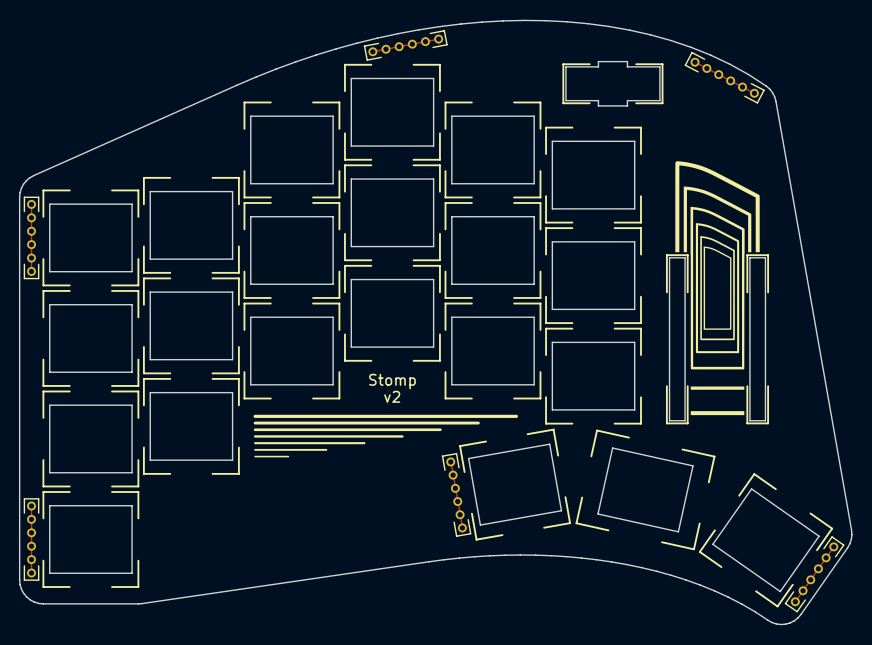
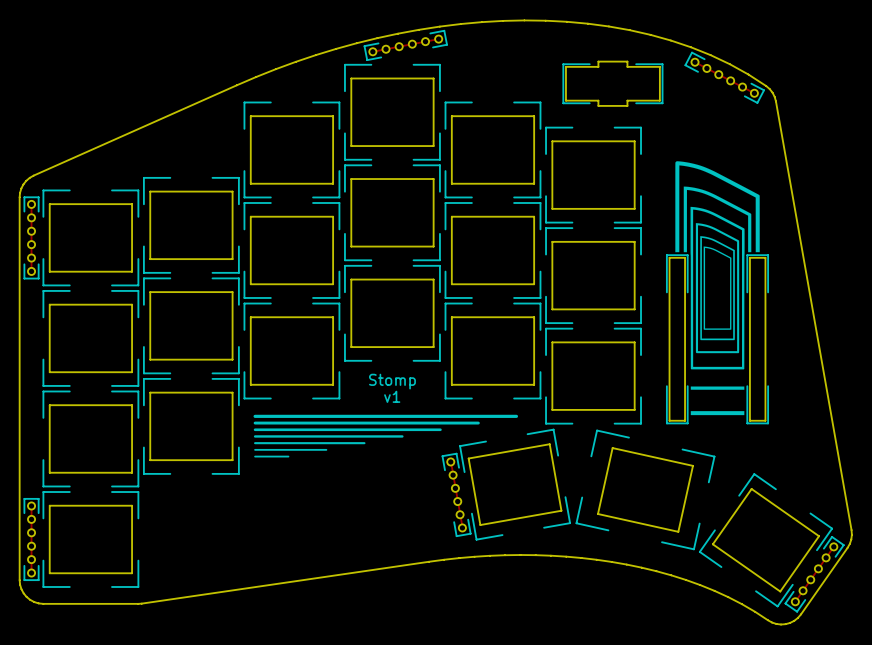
text: v2 (392, 396) -> v1 (392, 396)

